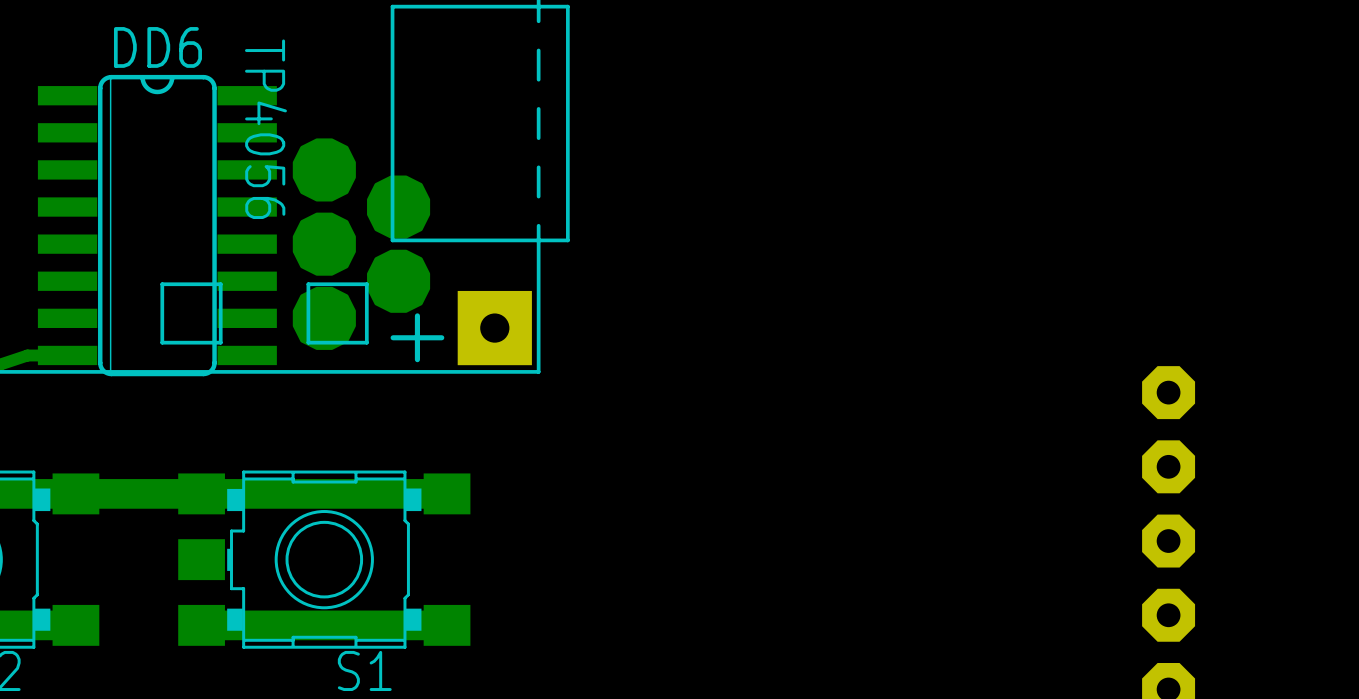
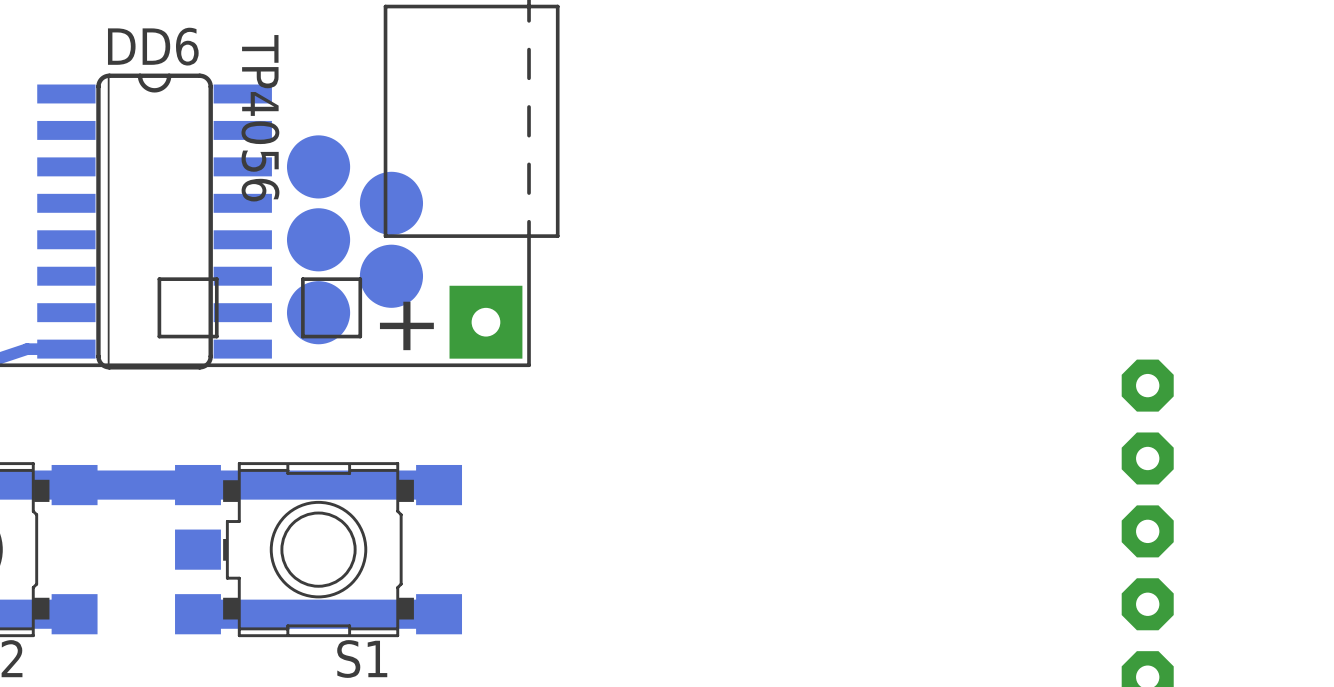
part footprint: [292, 138, 356, 202] -> [286, 135, 351, 199]
part footprint: [367, 175, 431, 239] -> [359, 171, 424, 235]
part footprint: [292, 212, 356, 276] -> [286, 208, 351, 272]
part footprint: [367, 249, 431, 313] -> [359, 244, 424, 308]
part footprint: [292, 286, 356, 350] -> [286, 281, 351, 345]

